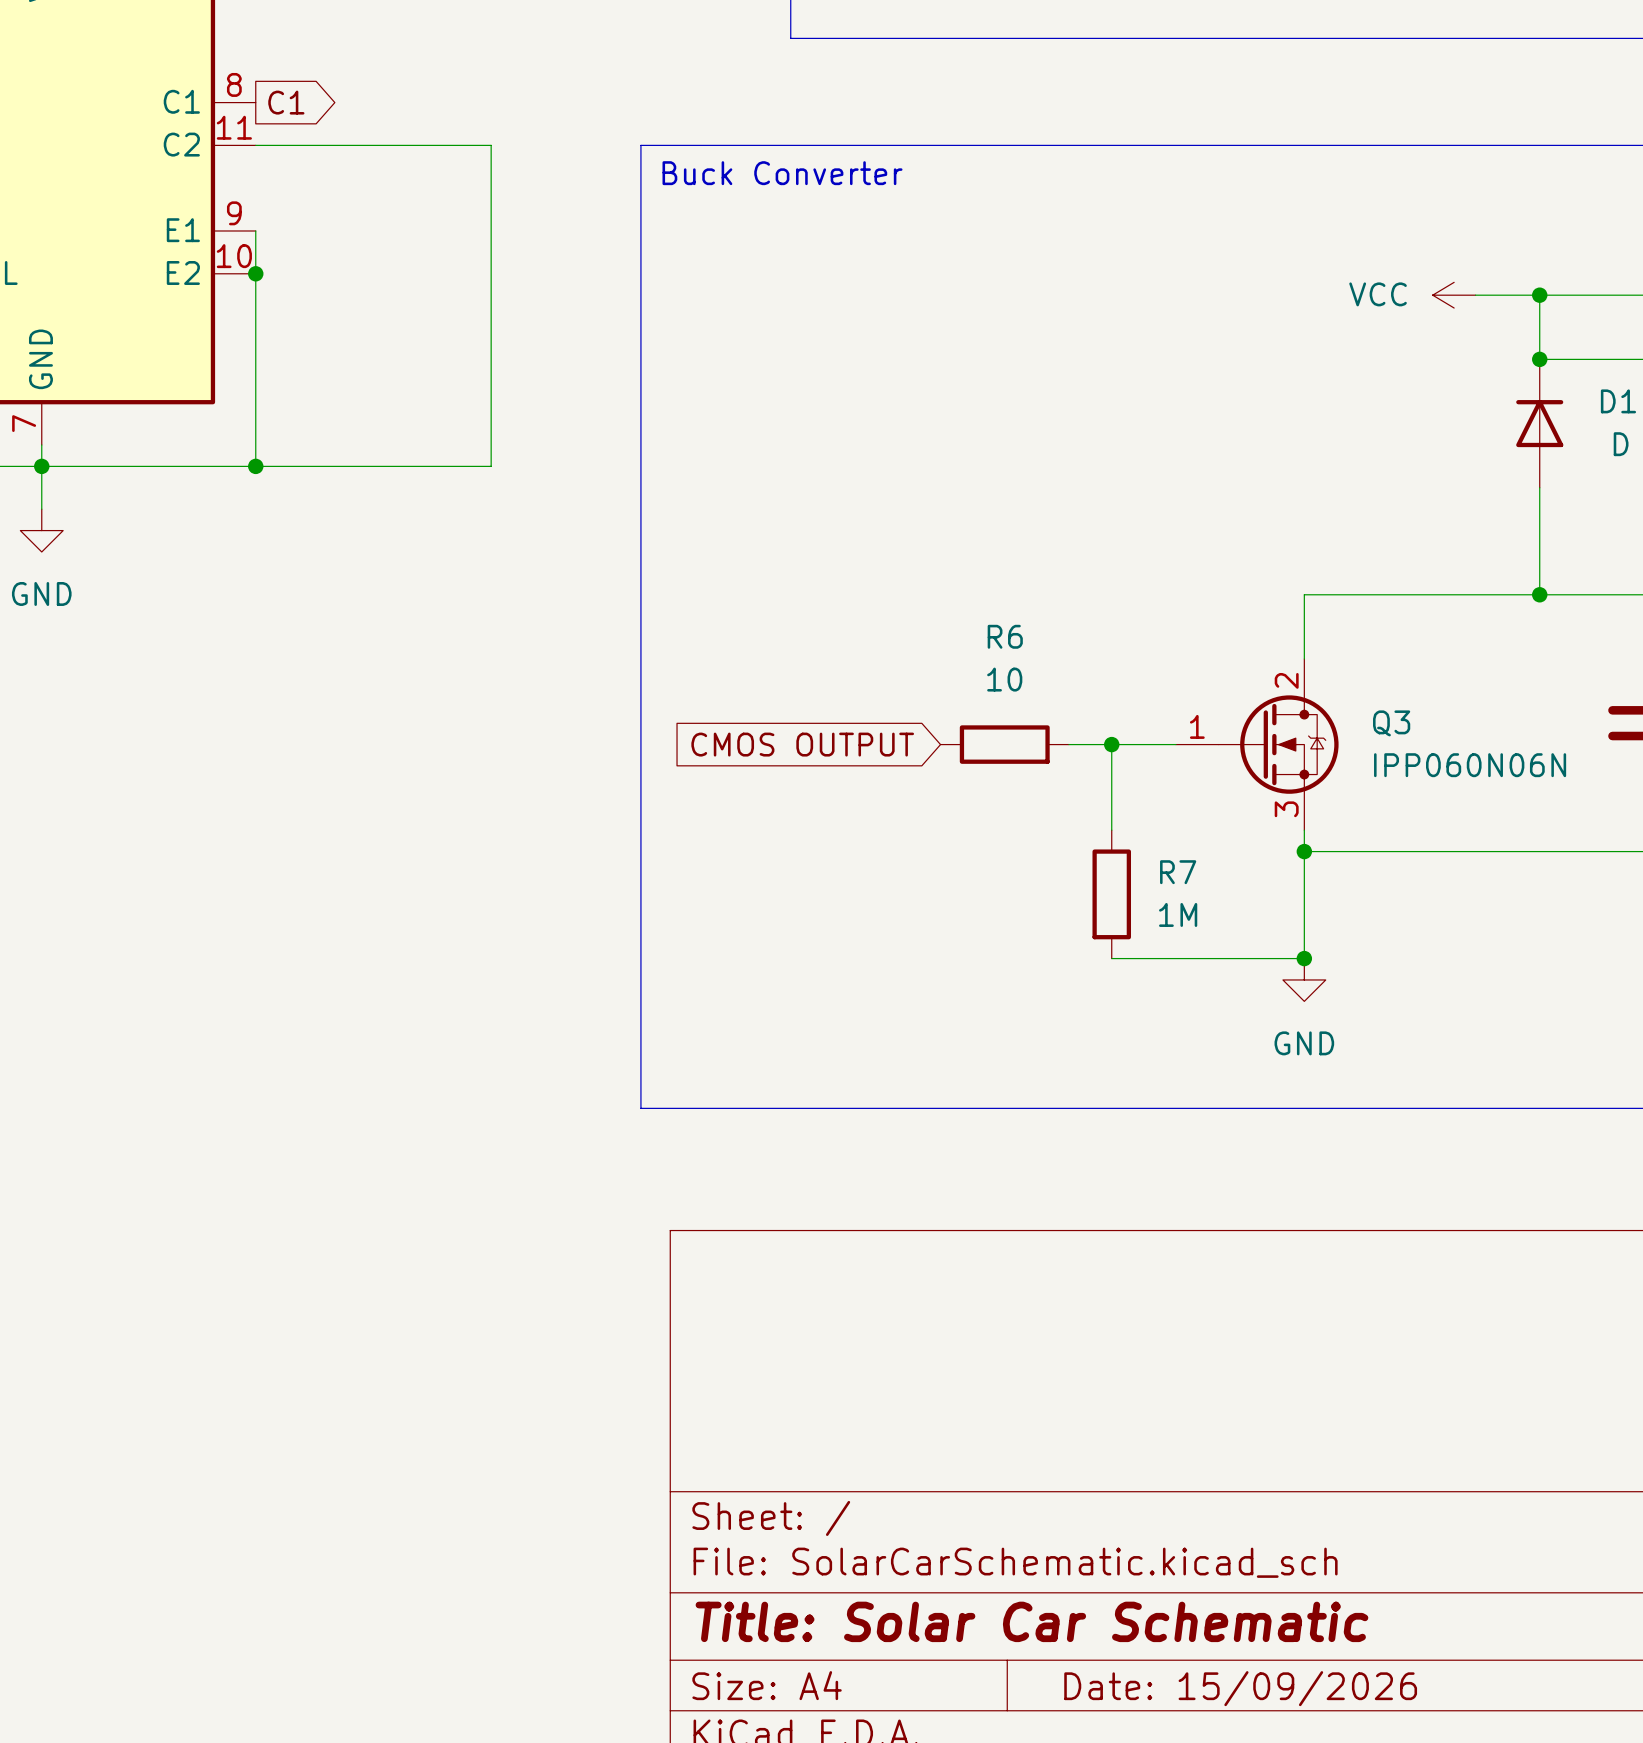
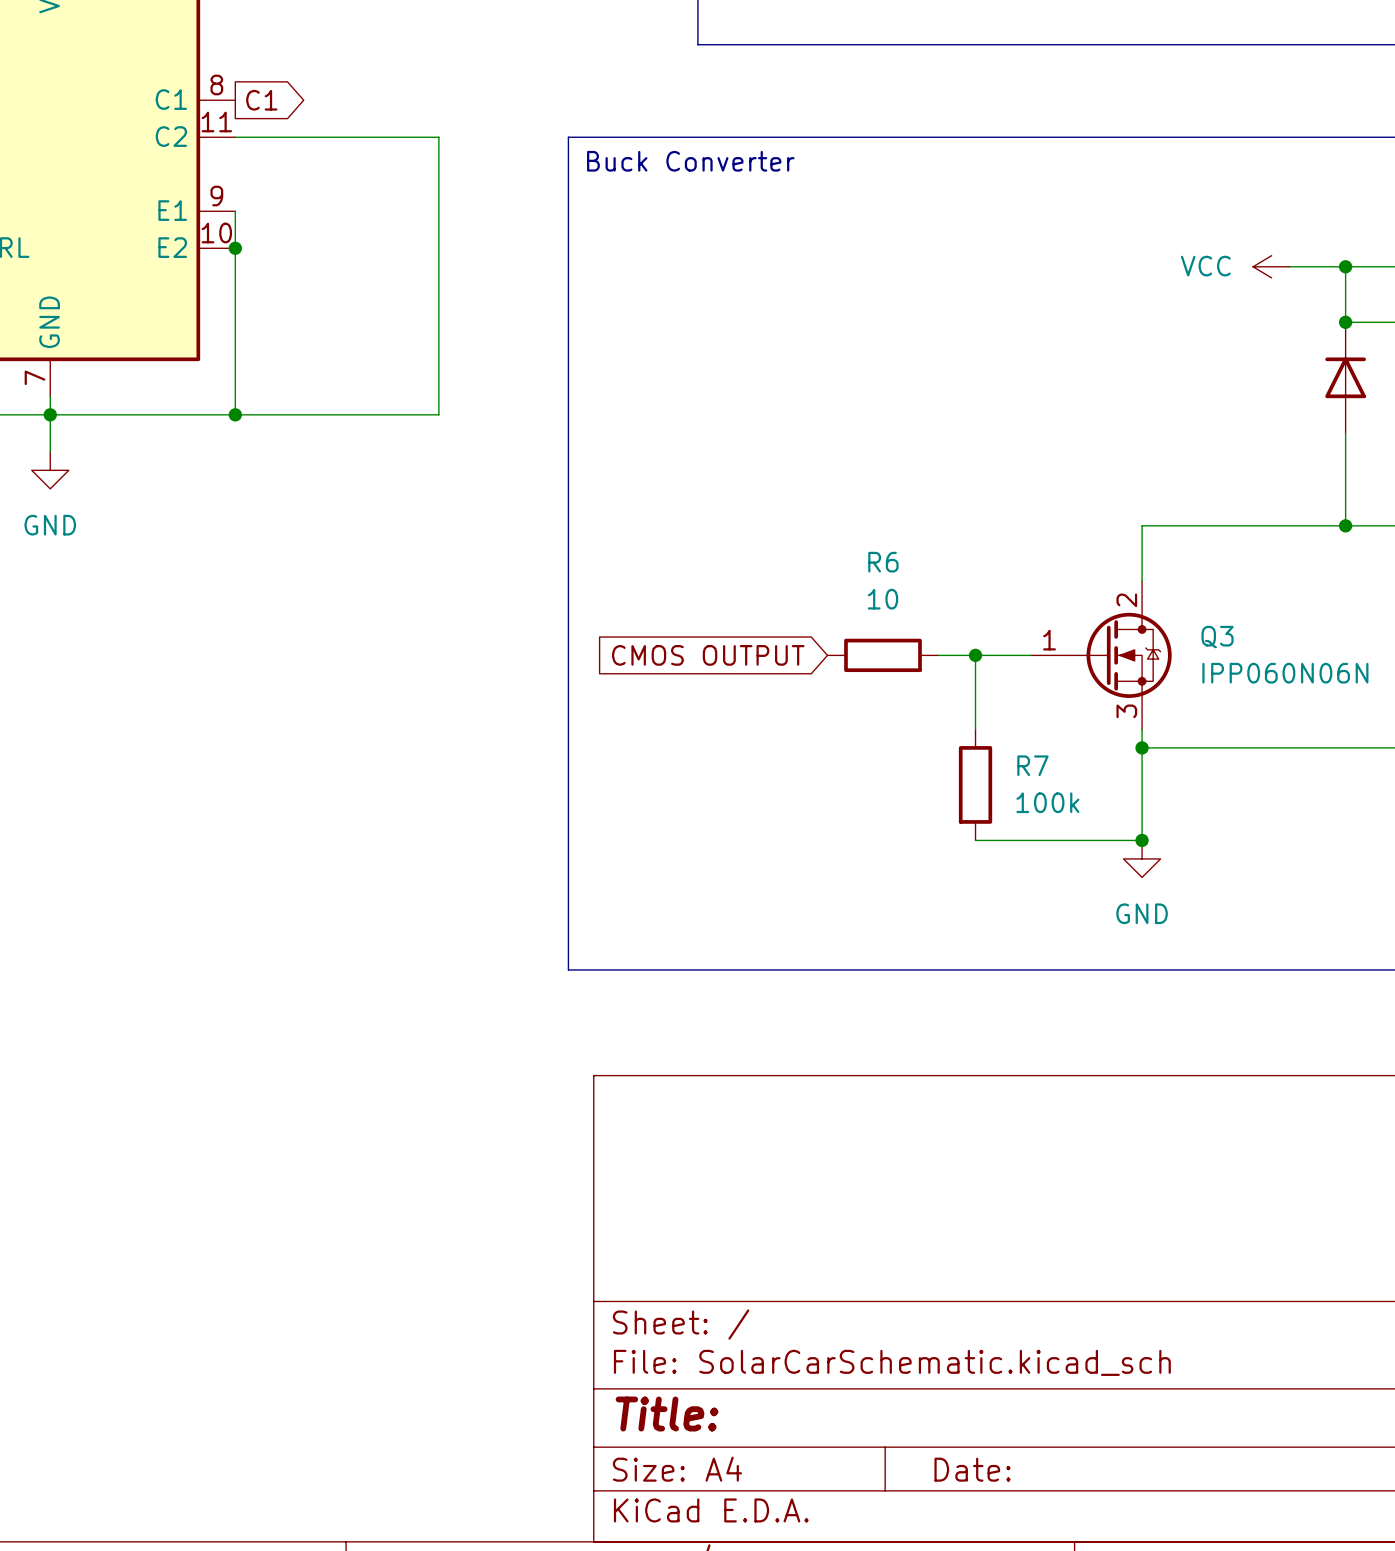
R7 value: 1M (1178, 914) -> 100k (1047, 802)
title block: Title: Solar Car Schematic (1031, 1621) -> Title: (667, 1414)
title block: Date: 15/09/2026 (1240, 1688) -> Date: (972, 1469)

